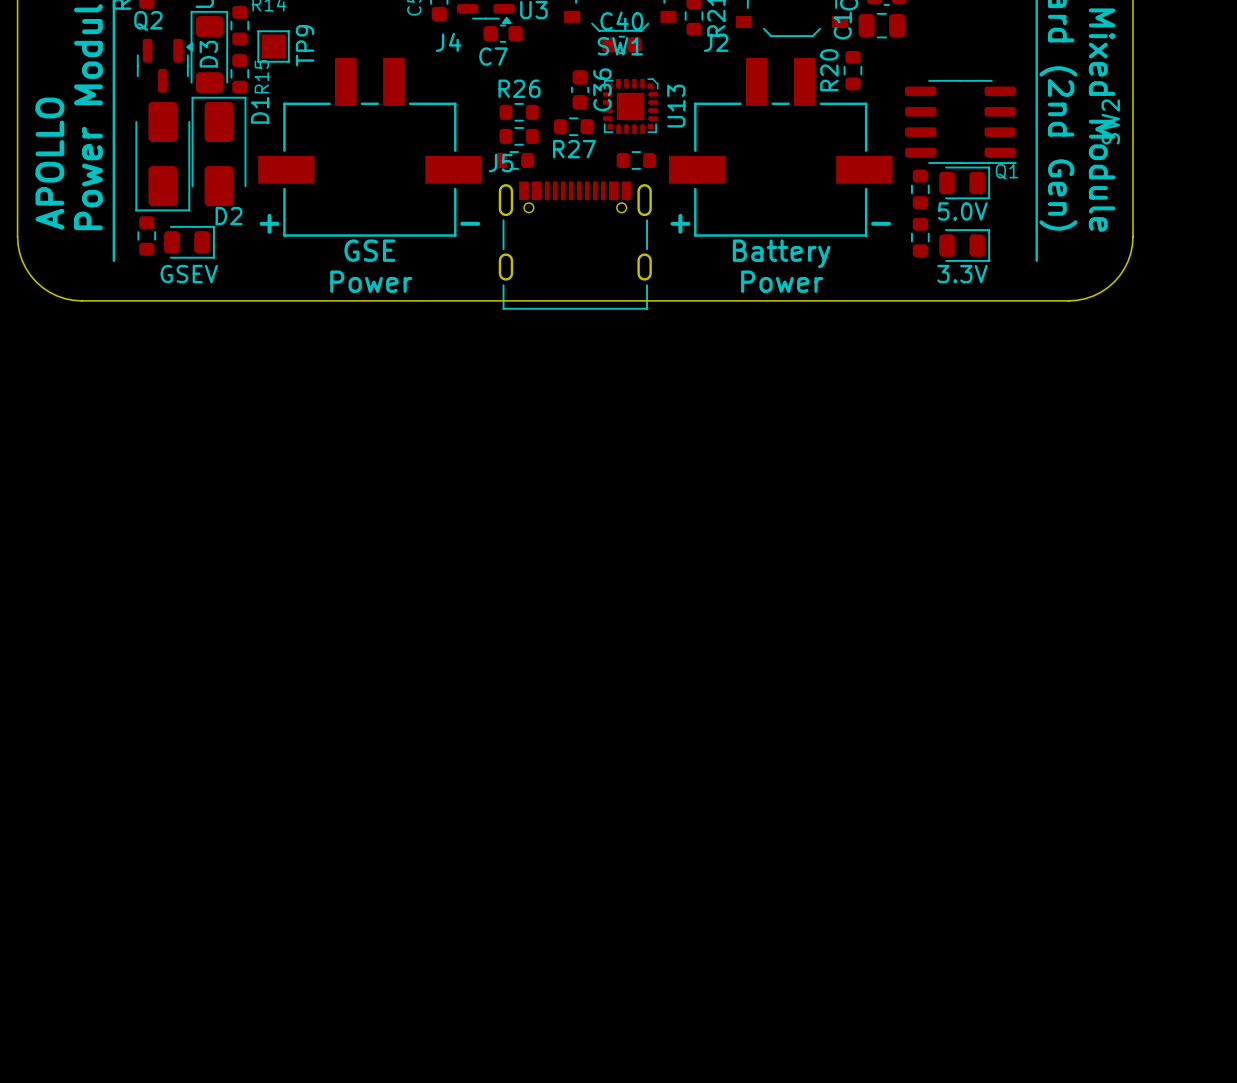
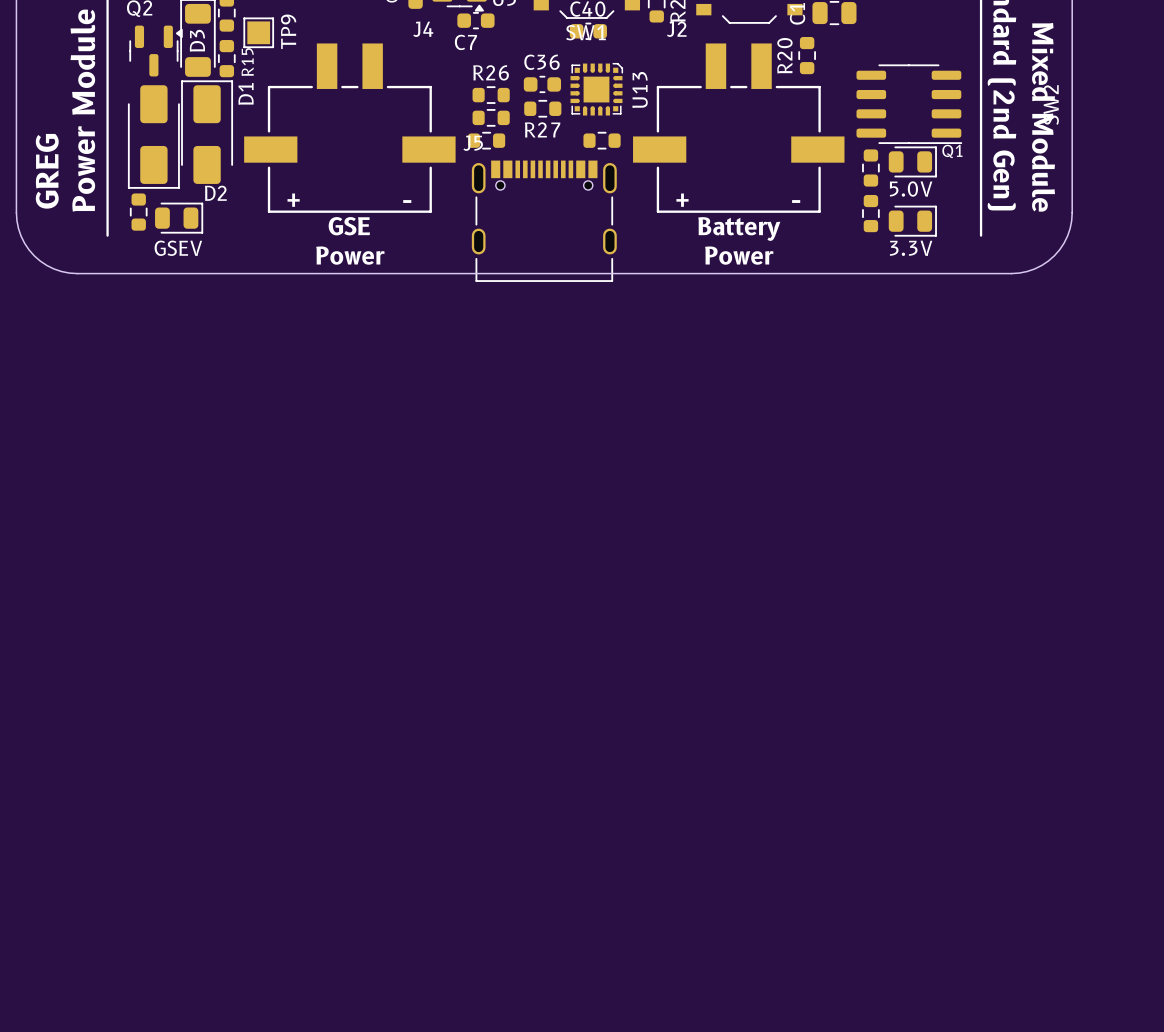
C36 rotation: 0° (580, 89) -> 90° clockwise (542, 84)
C36 name position: C36 (602, 89) -> C36 (541, 62)
text: APOLLO (49, 163) -> GREG (47, 171)

